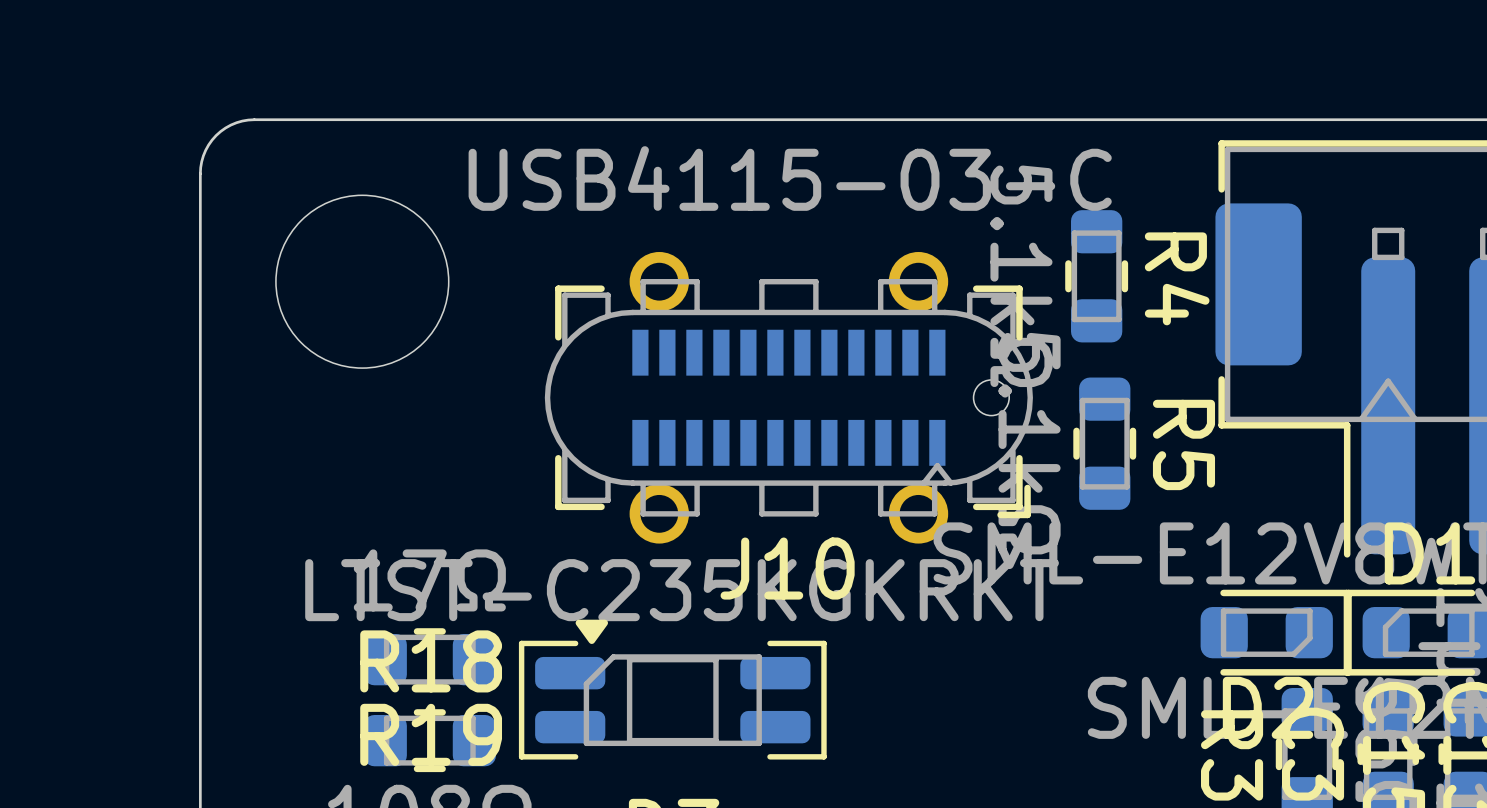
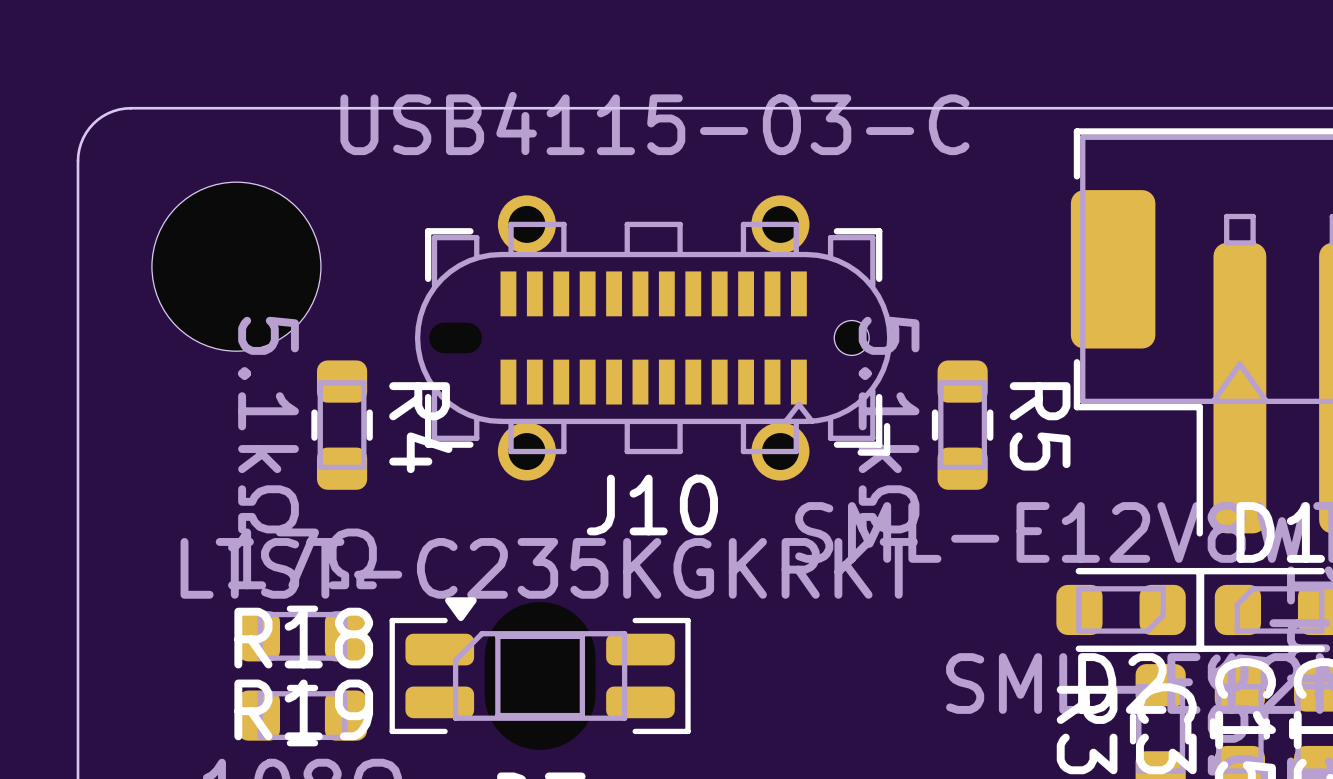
R4 position: (1096, 276) -> (342, 425)
J10 position: (788, 397) -> (653, 337)

